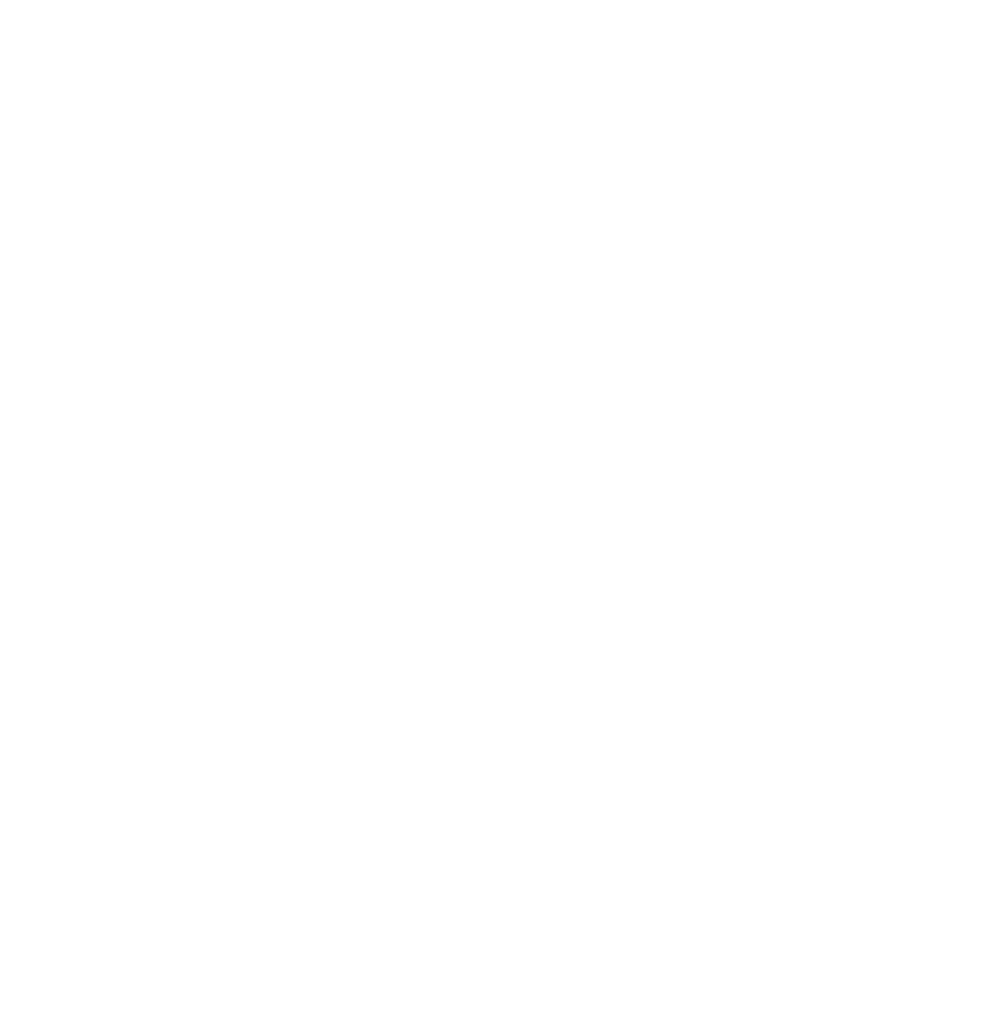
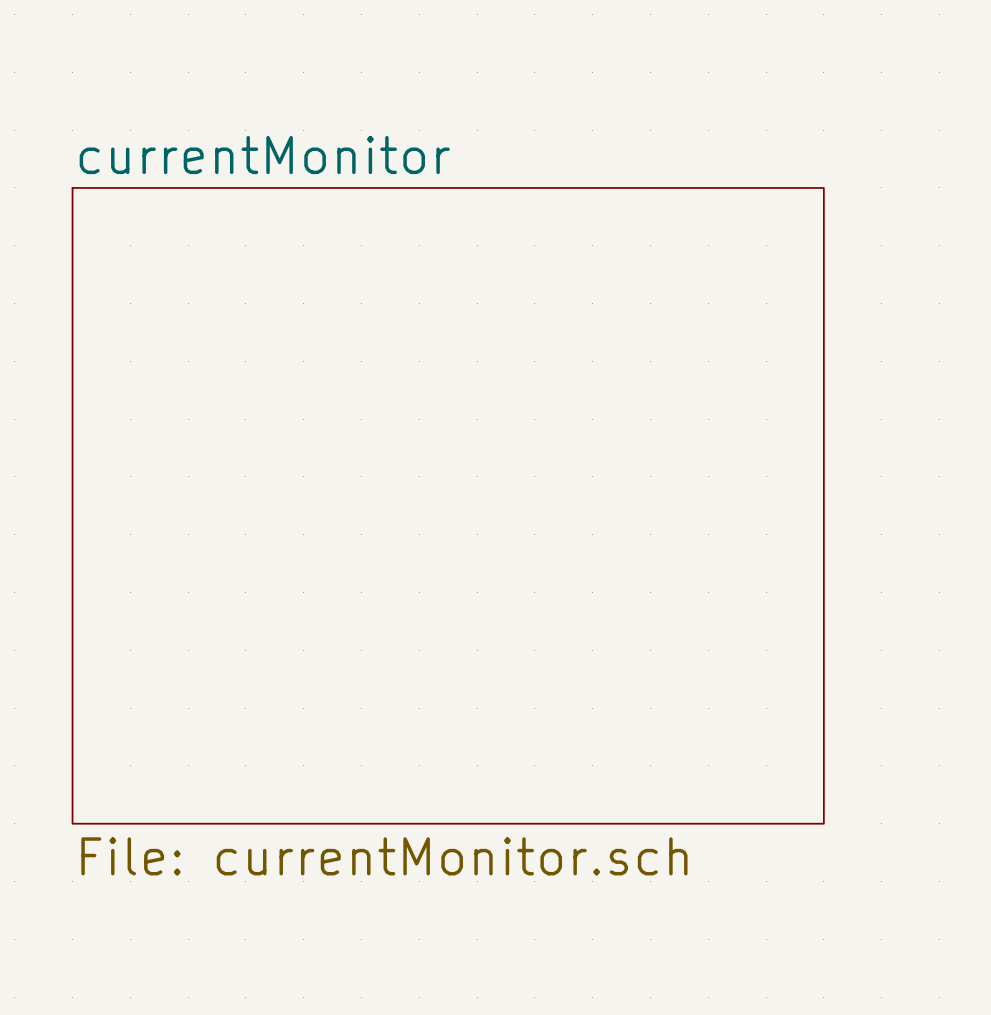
sheet currentMonitor: none -> File: currentMonitor.sch (448, 505)

